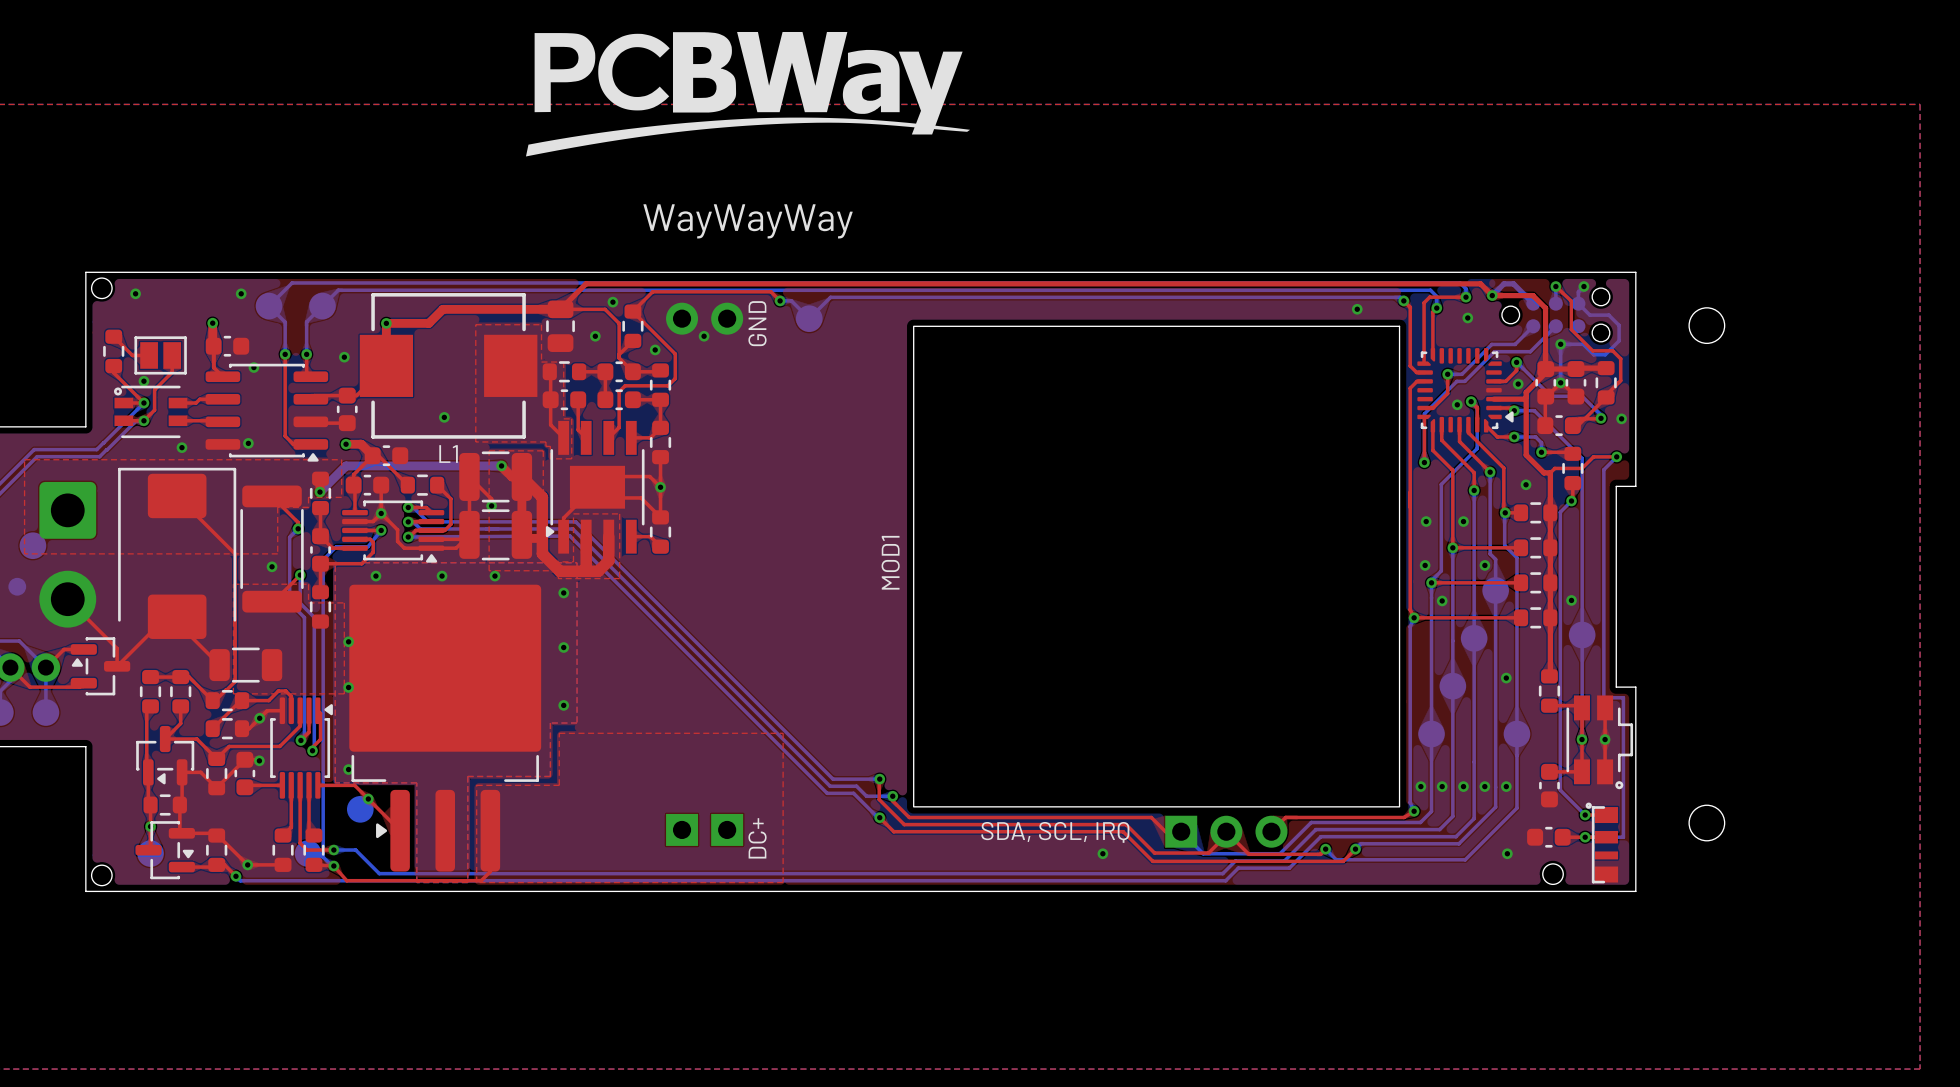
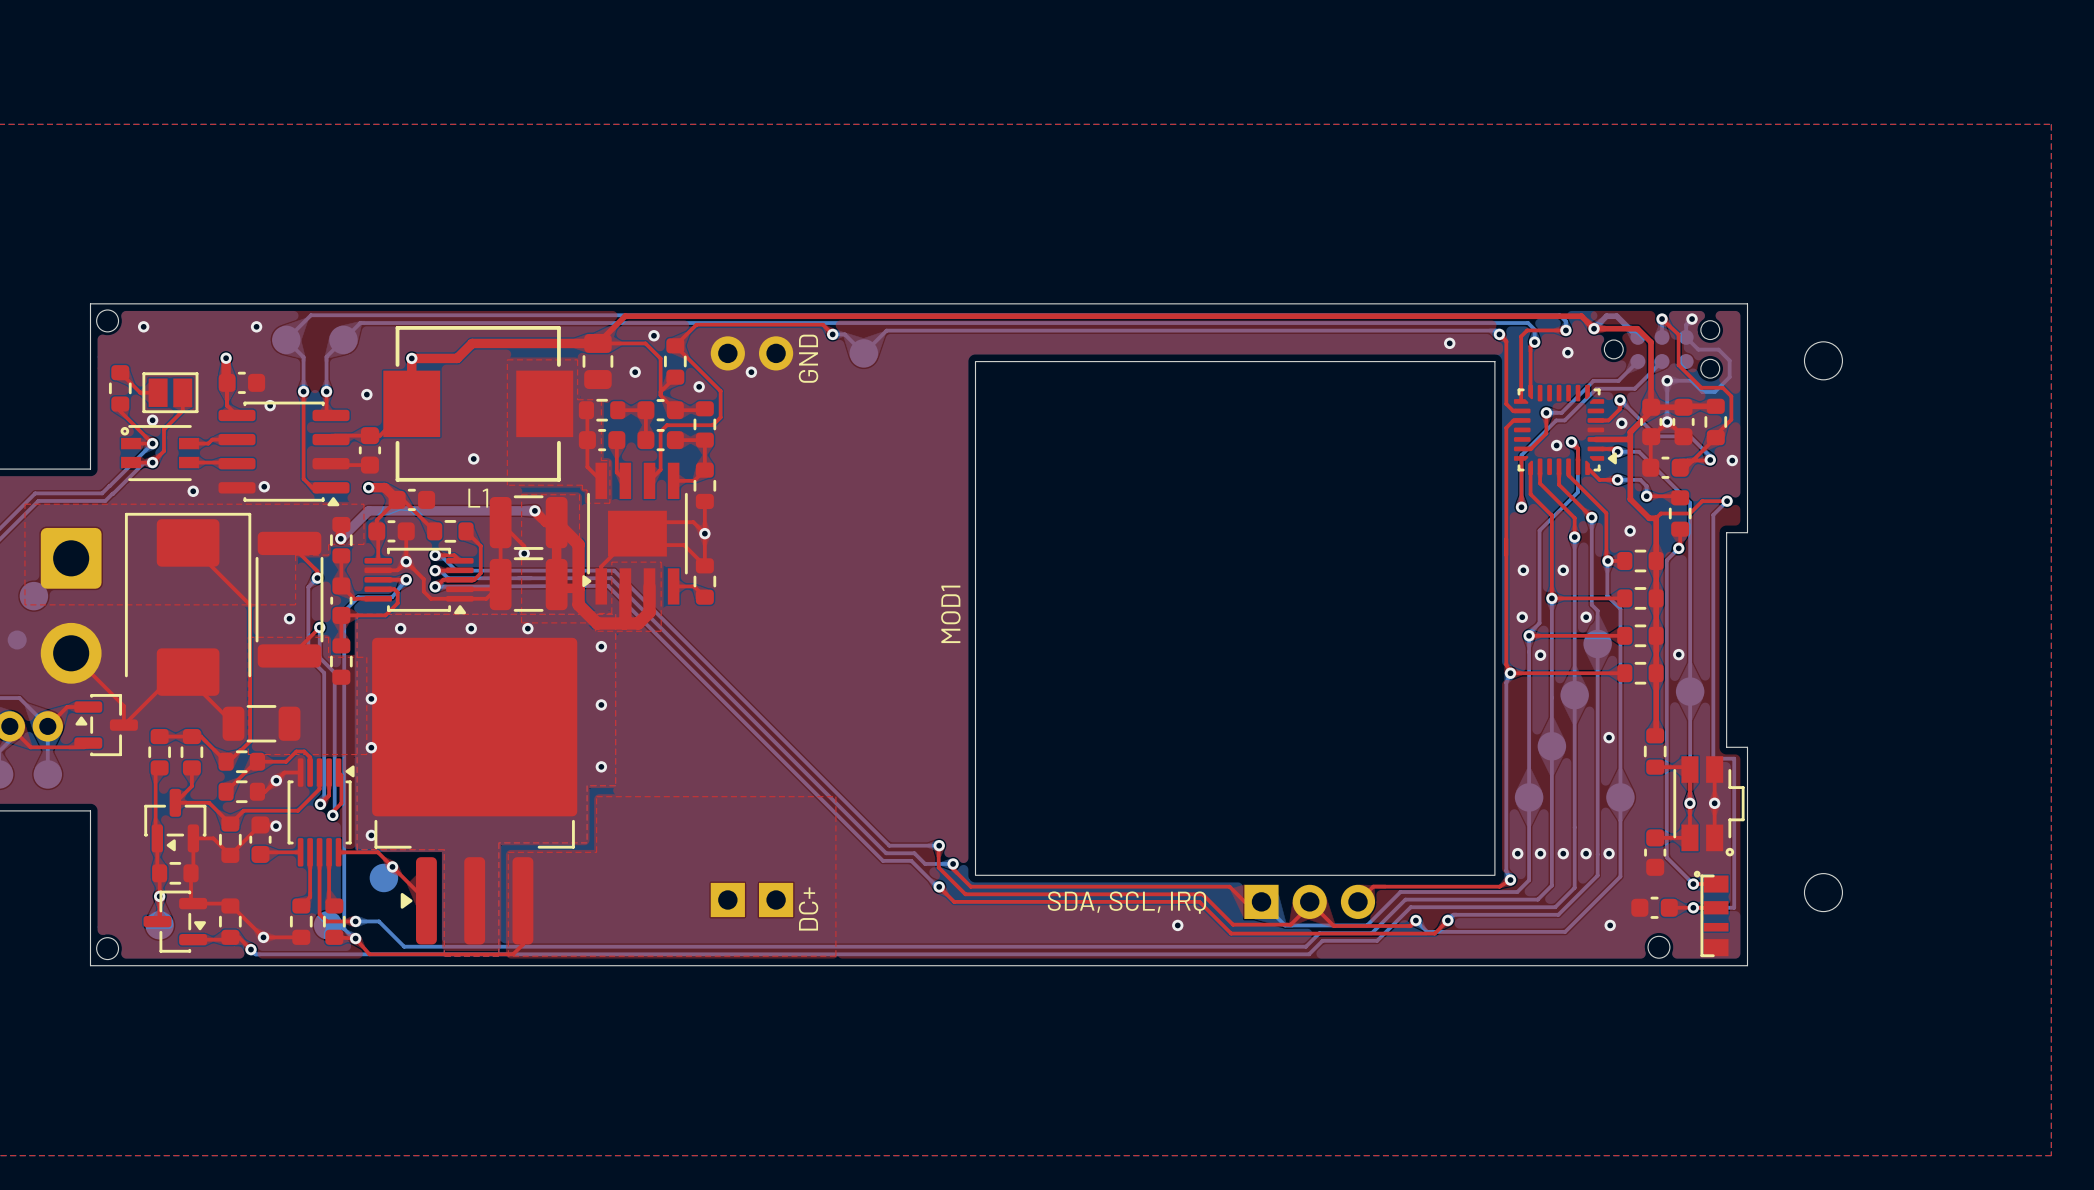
drawing: [525, 31, 971, 157] -> none
text: WayWayWay (748, 221) -> none

